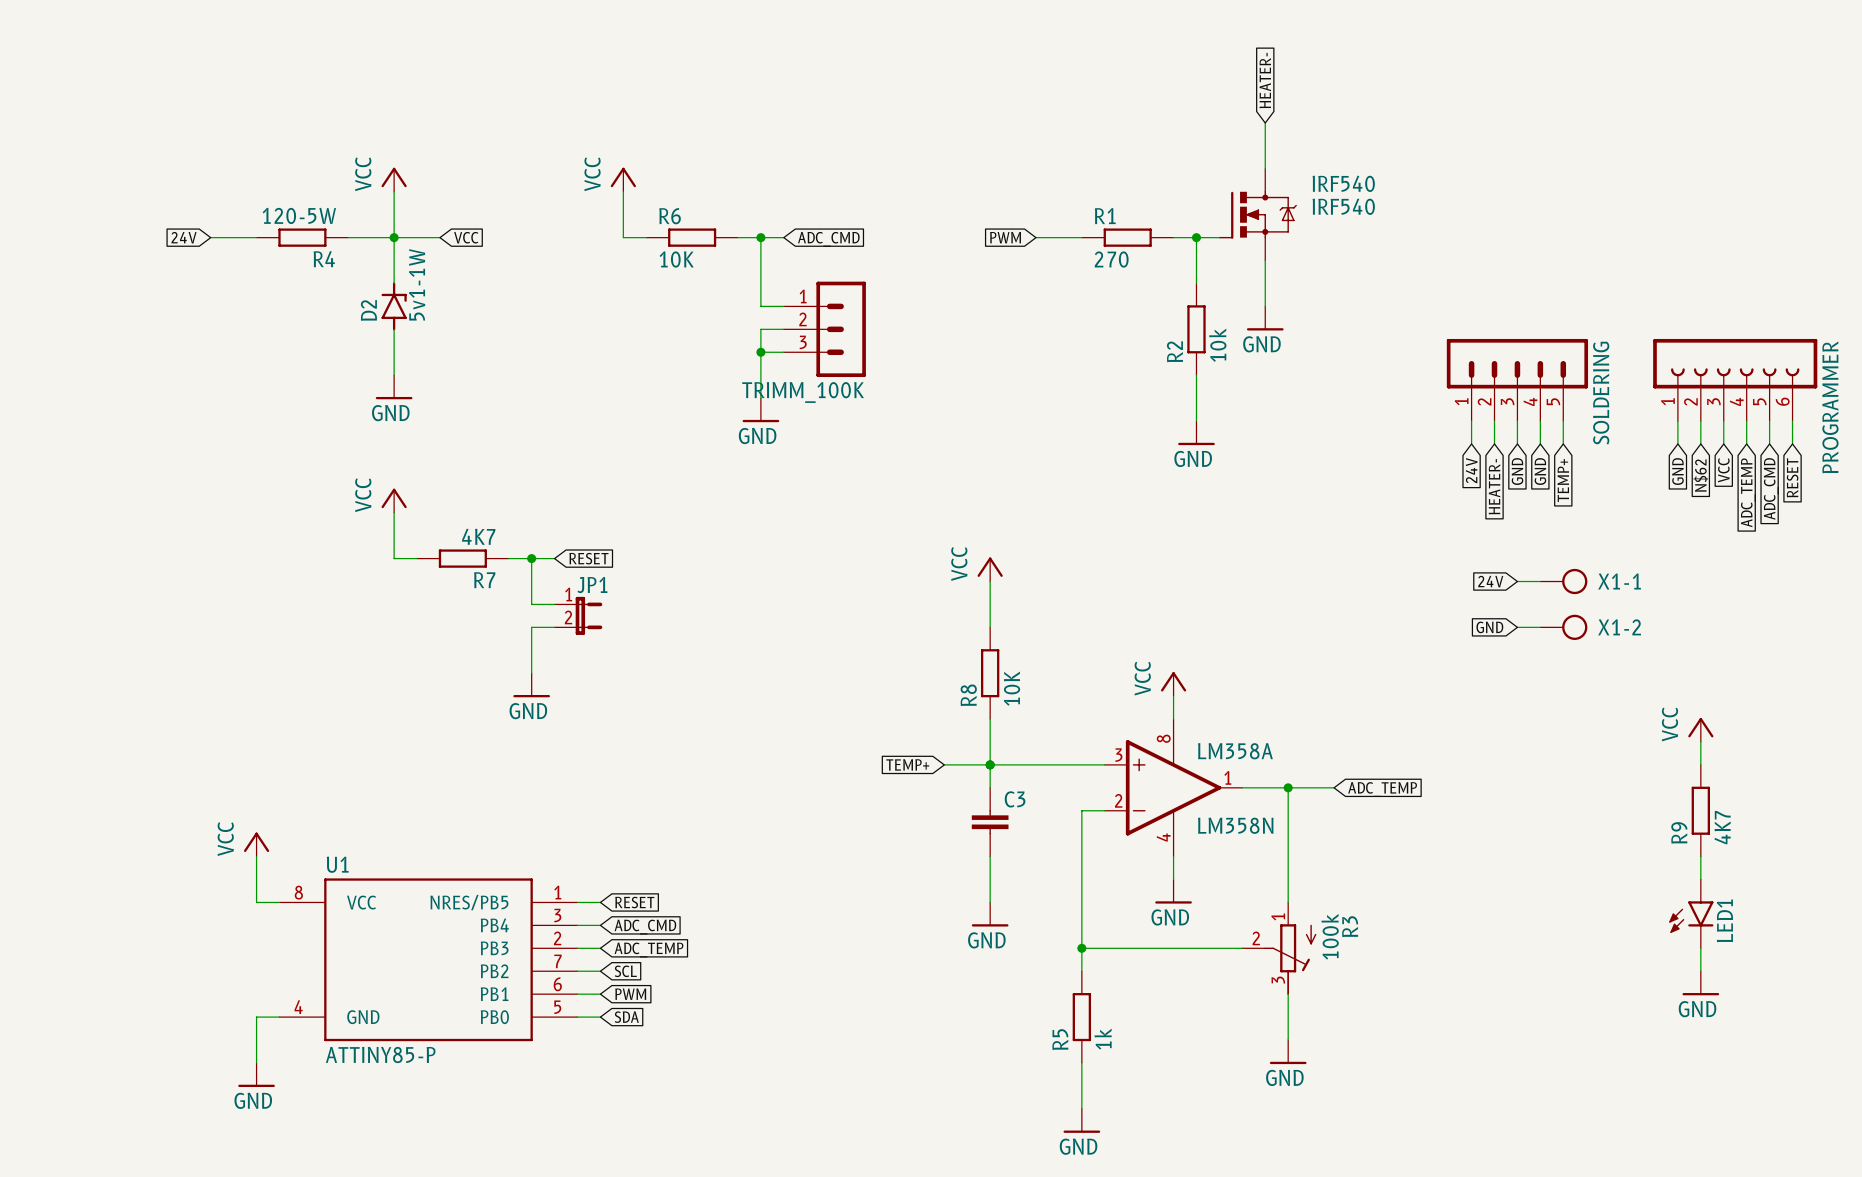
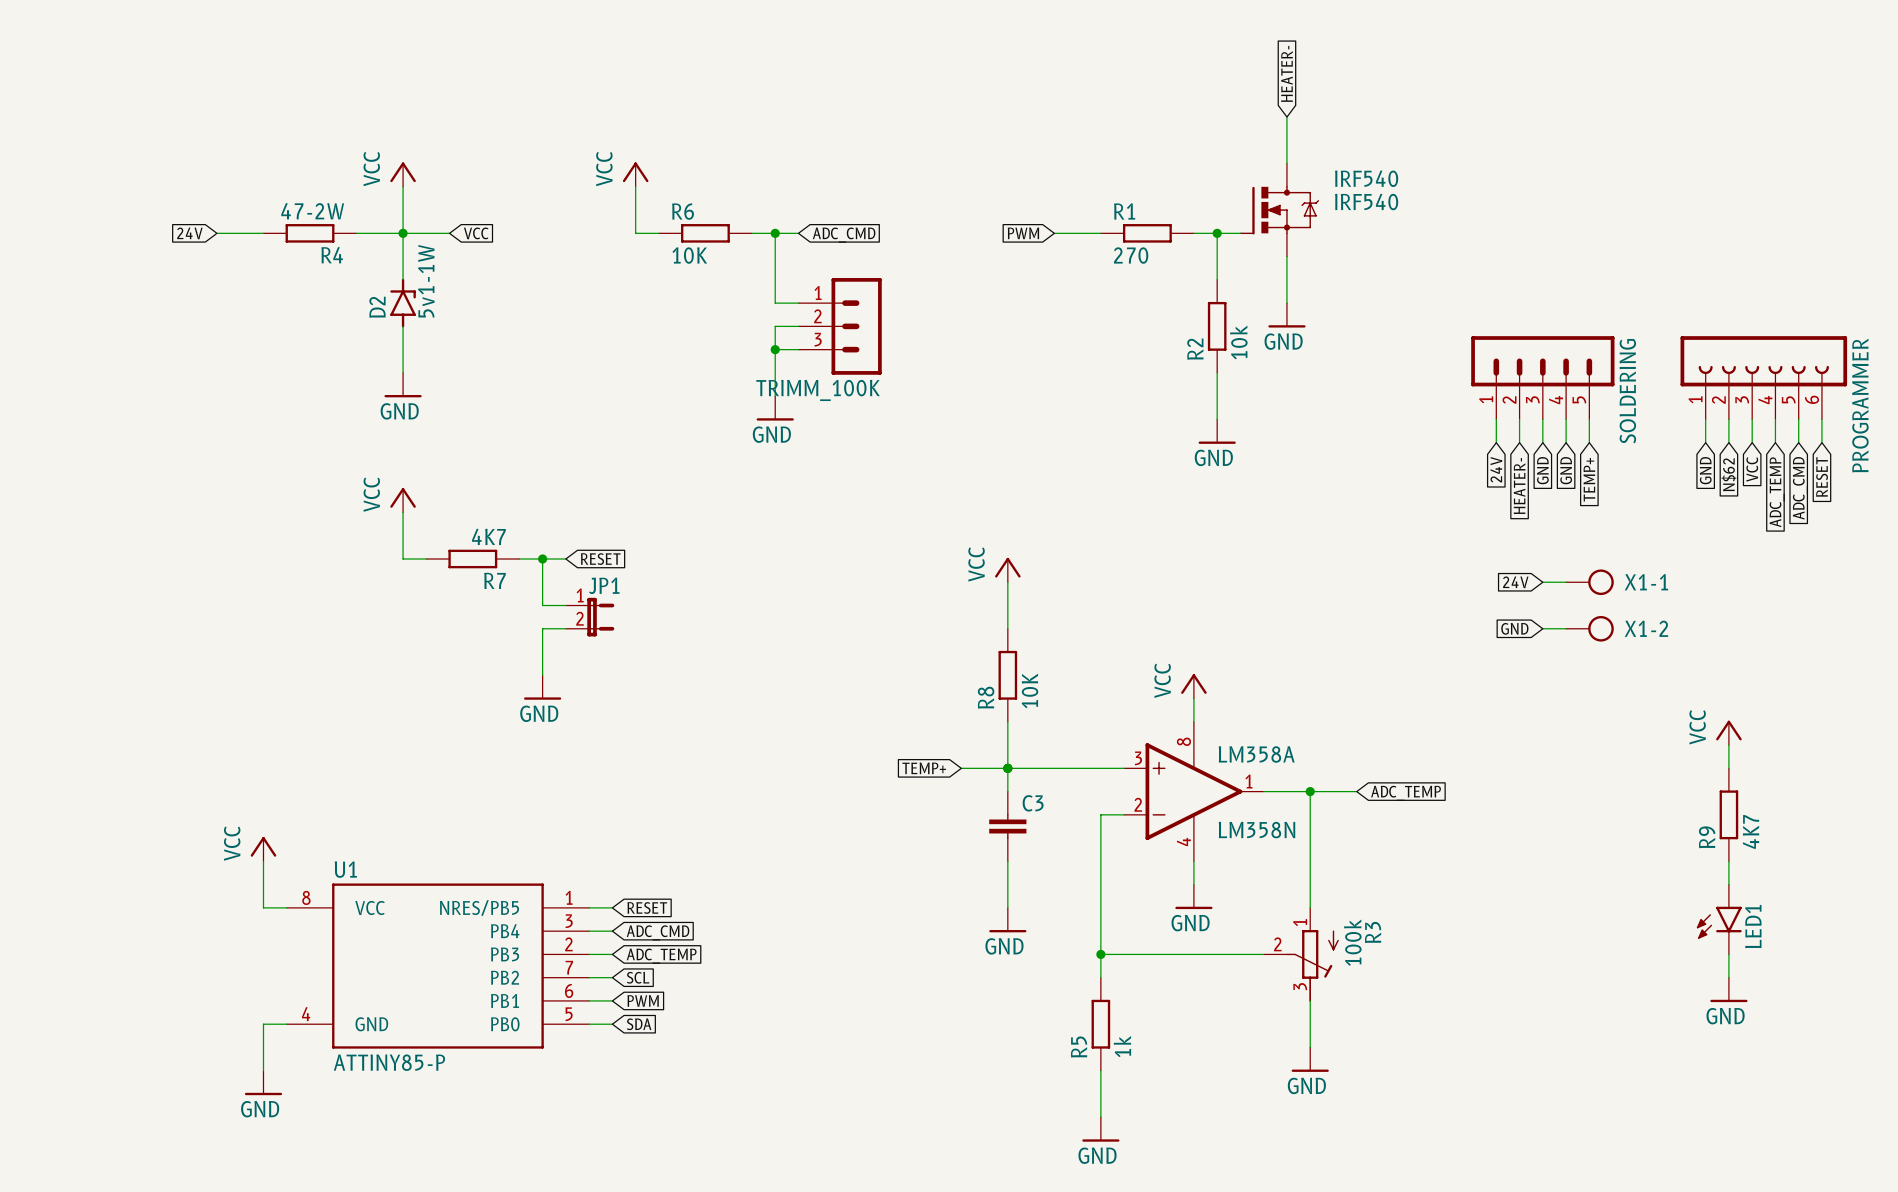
R4 value: 120-5W (299, 215) -> 47-2W (312, 211)

